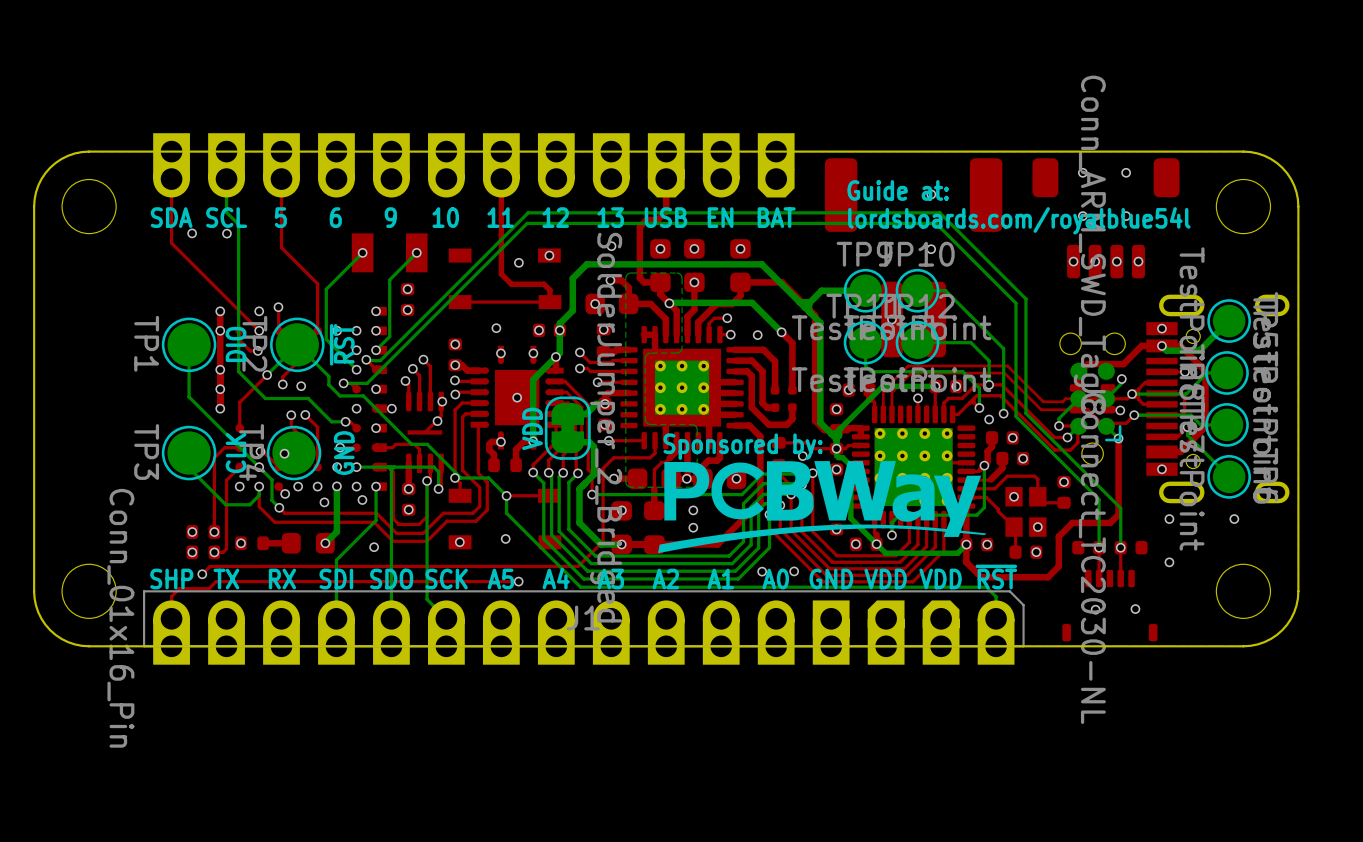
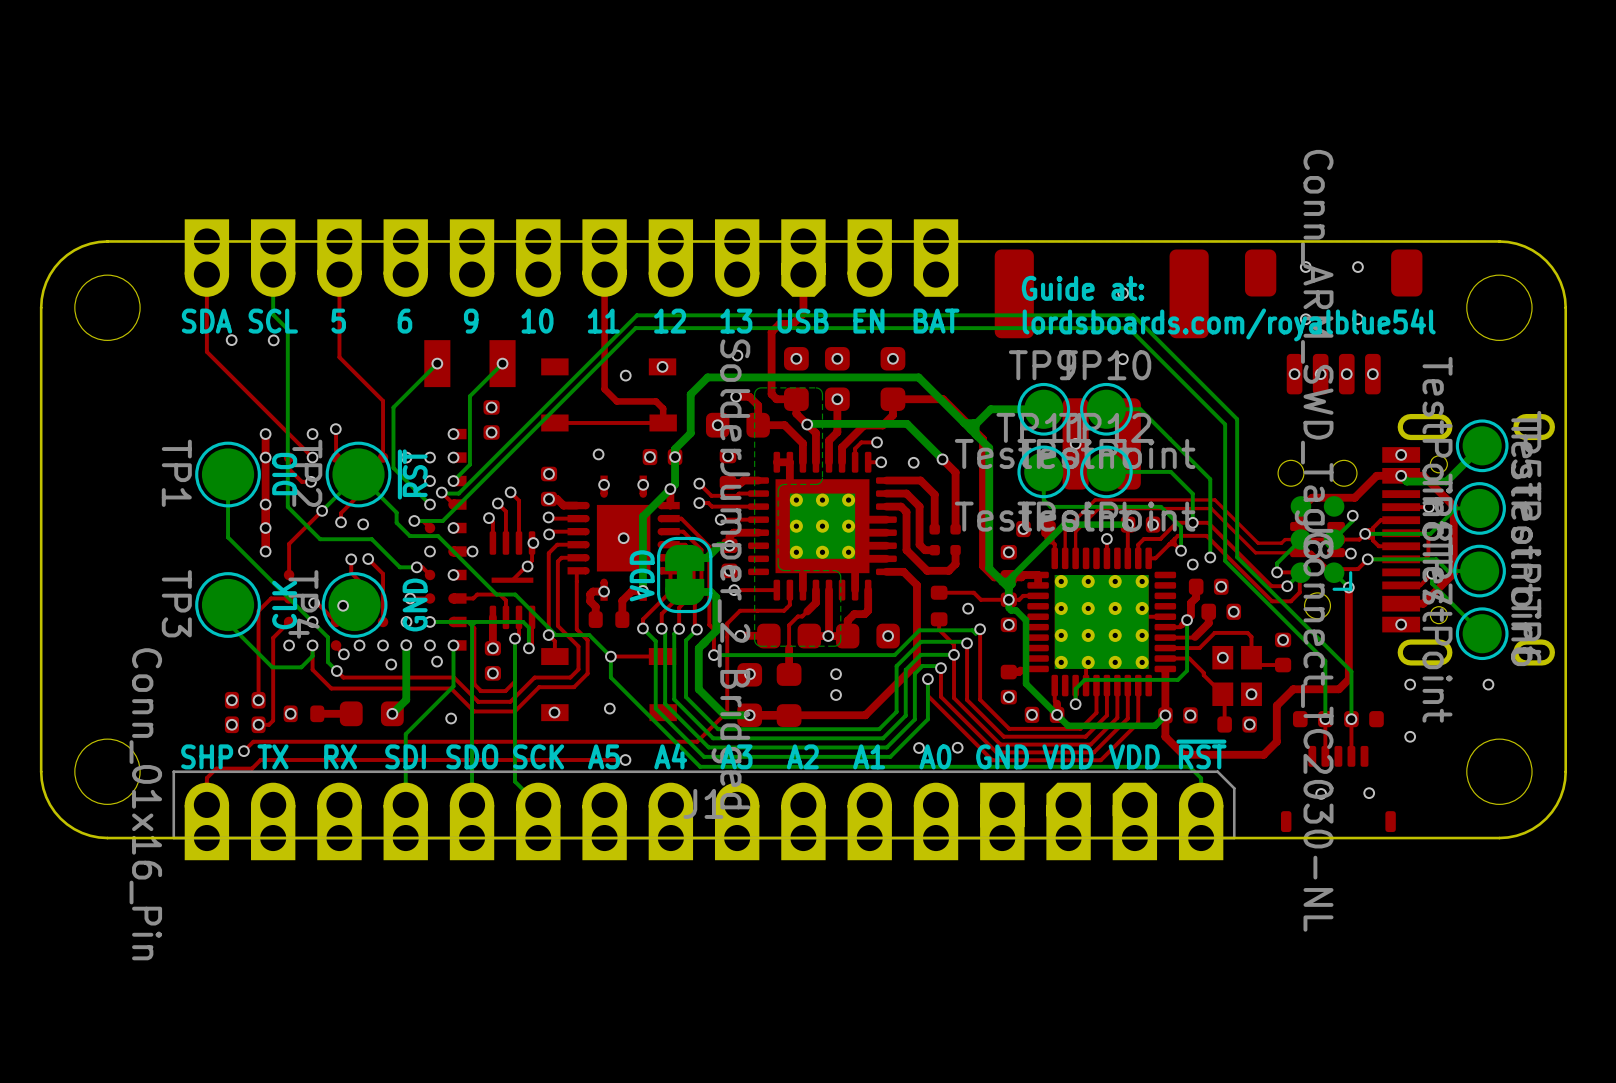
text: Sponsored by: (743, 446) -> none
drawing: [657, 461, 987, 554] -> none

